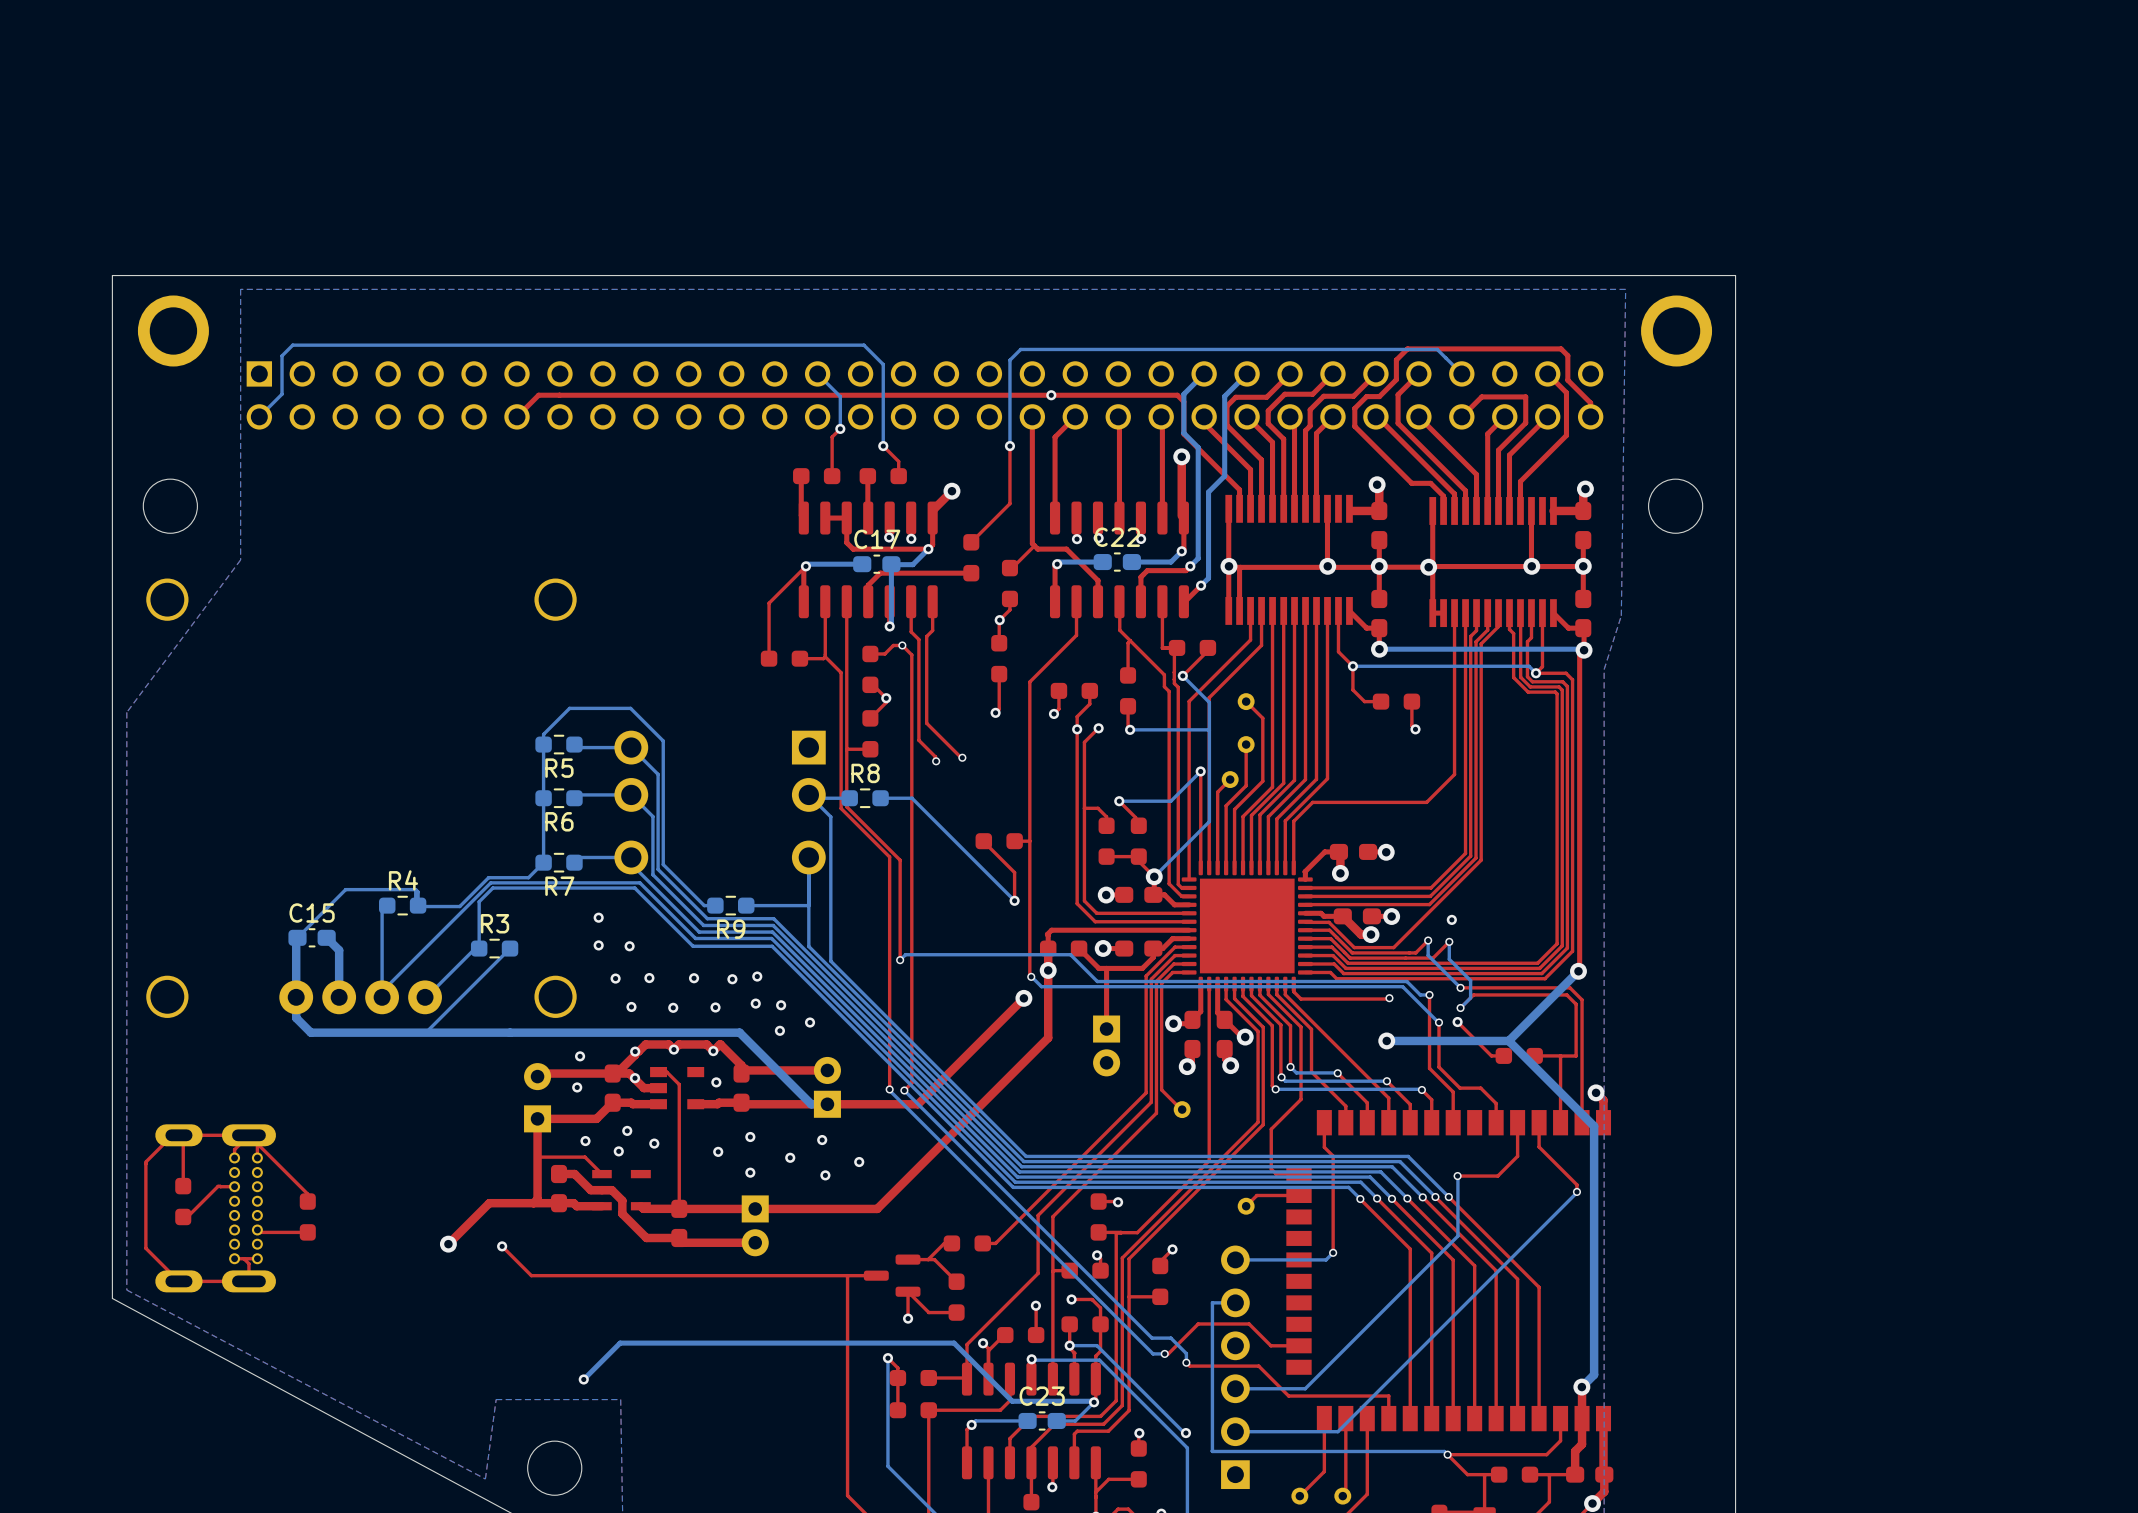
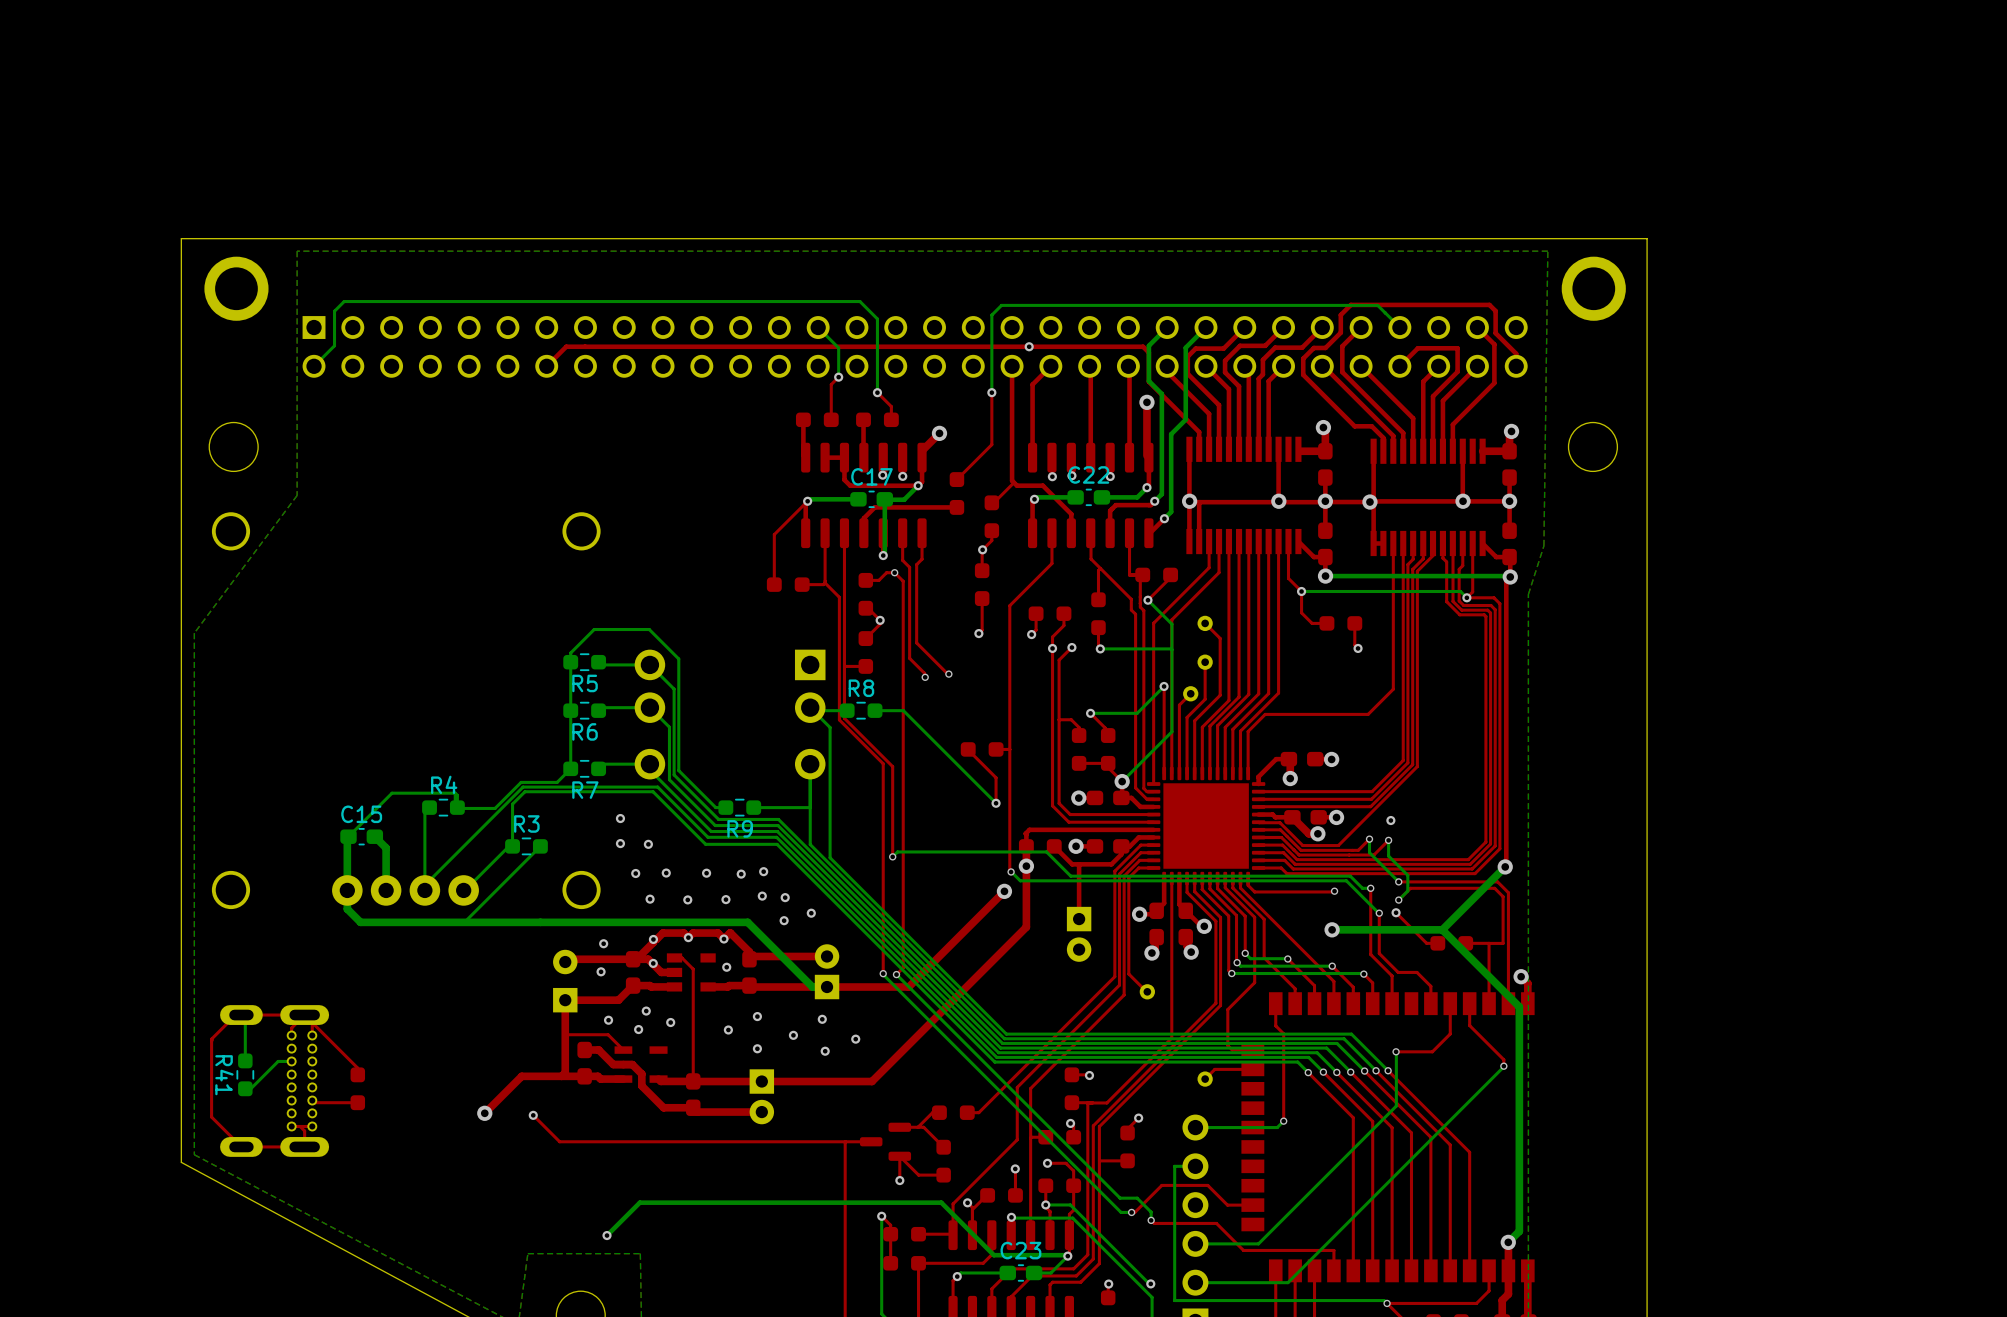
top track: (183, 1139) (183, 1186) -> none
bottom track: none -> (245, 1018) (245, 1060)
top track: (234, 1186) (218, 1186) (187, 1216) (183, 1216) -> none
bottom track: none -> (291, 1061) (278, 1061) (250, 1088) (245, 1088)
R41 side: top (183, 1201) -> bottom (245, 1074)

